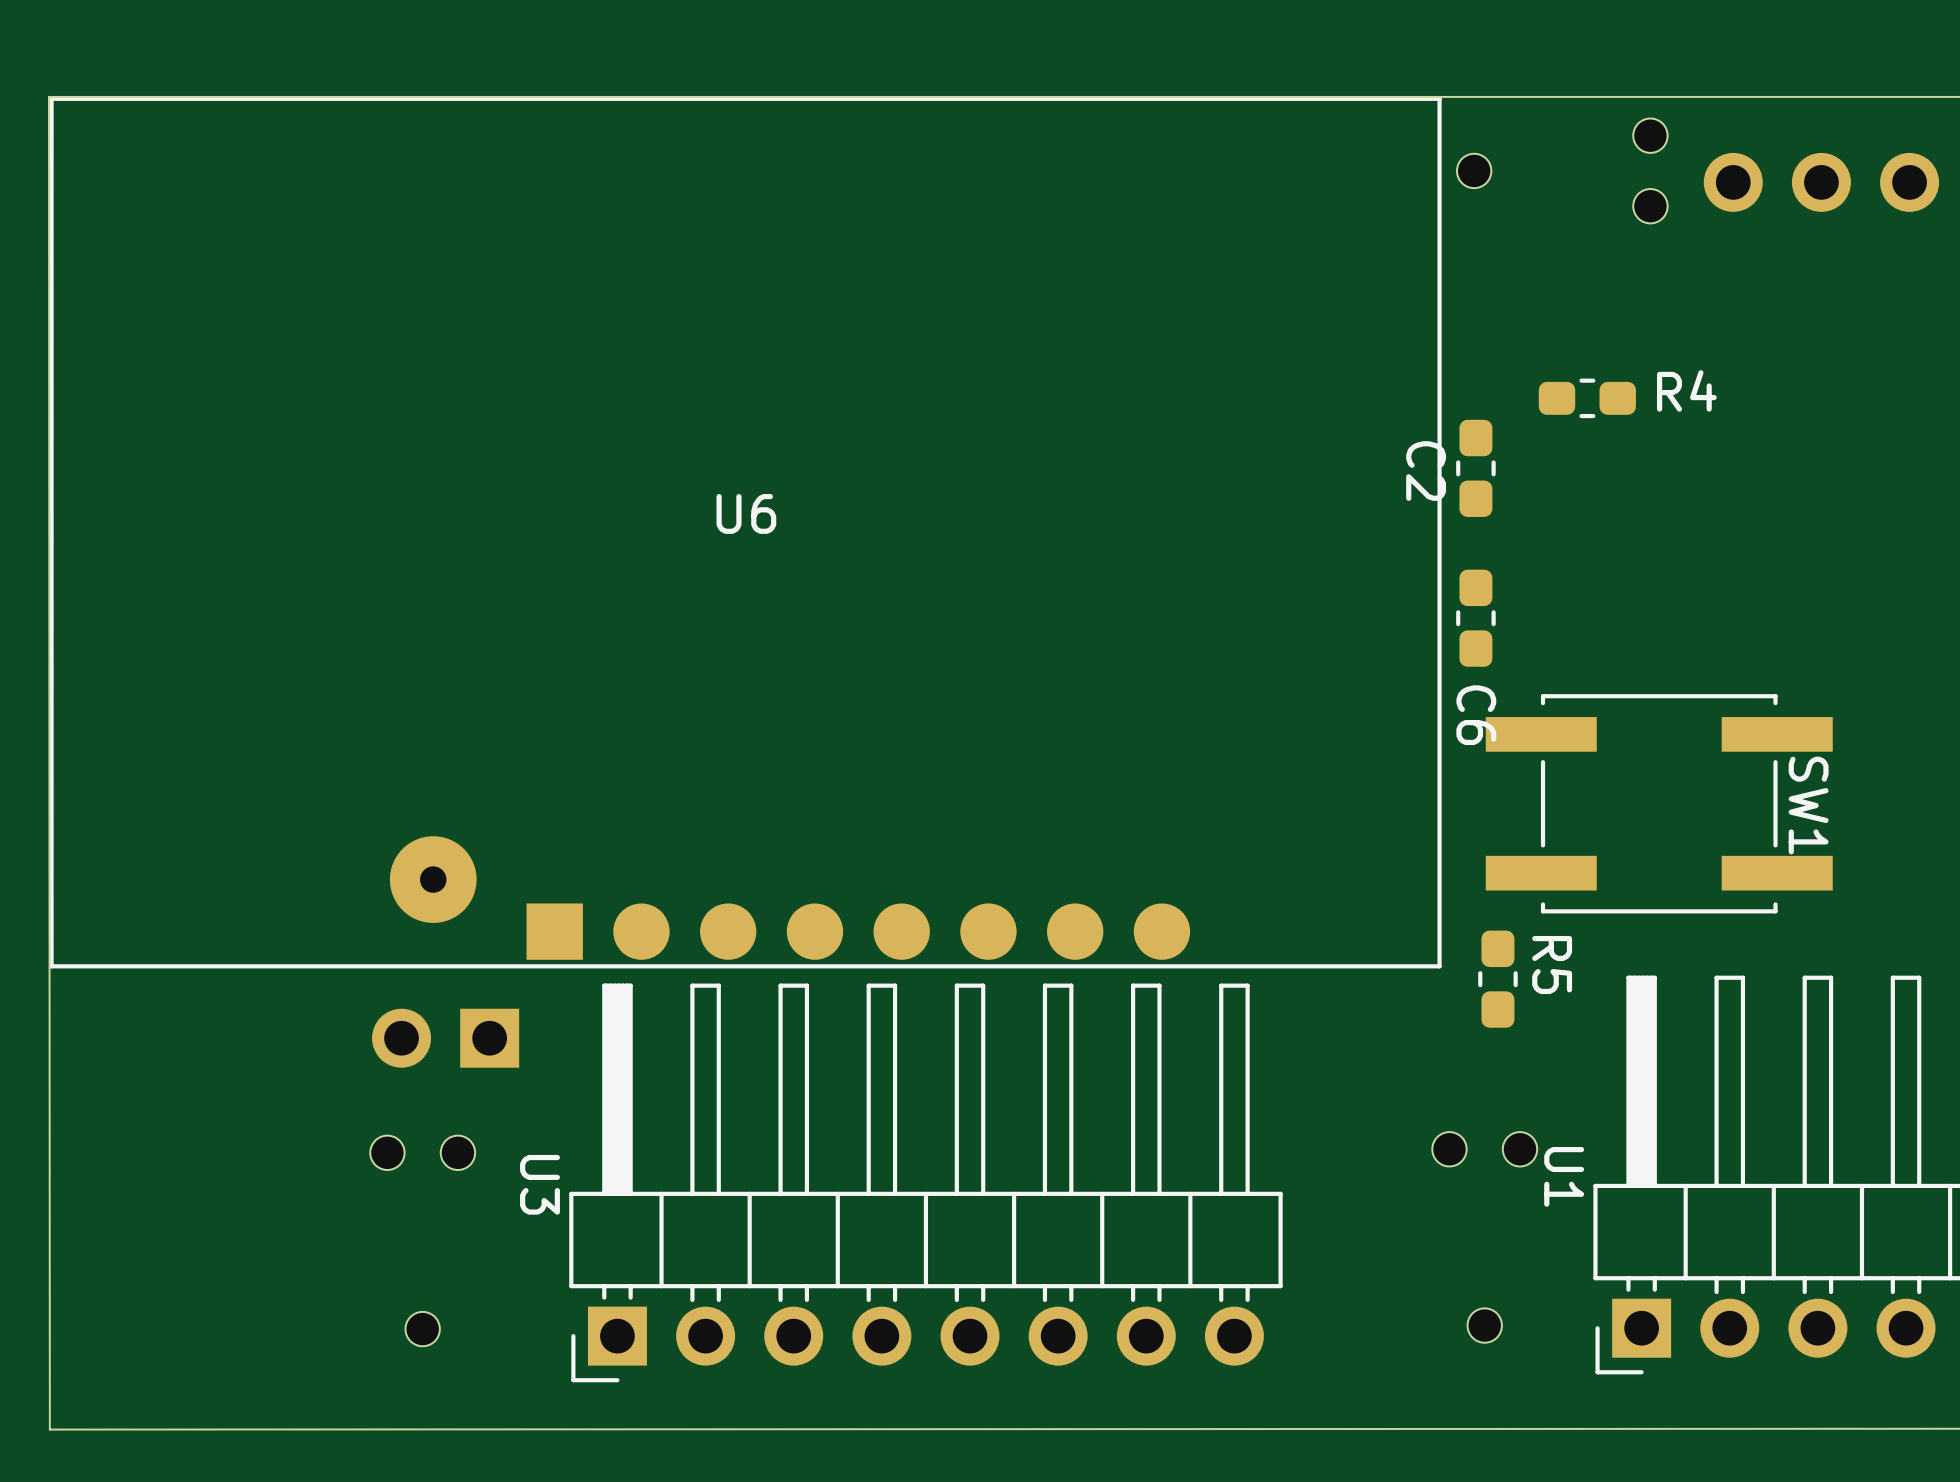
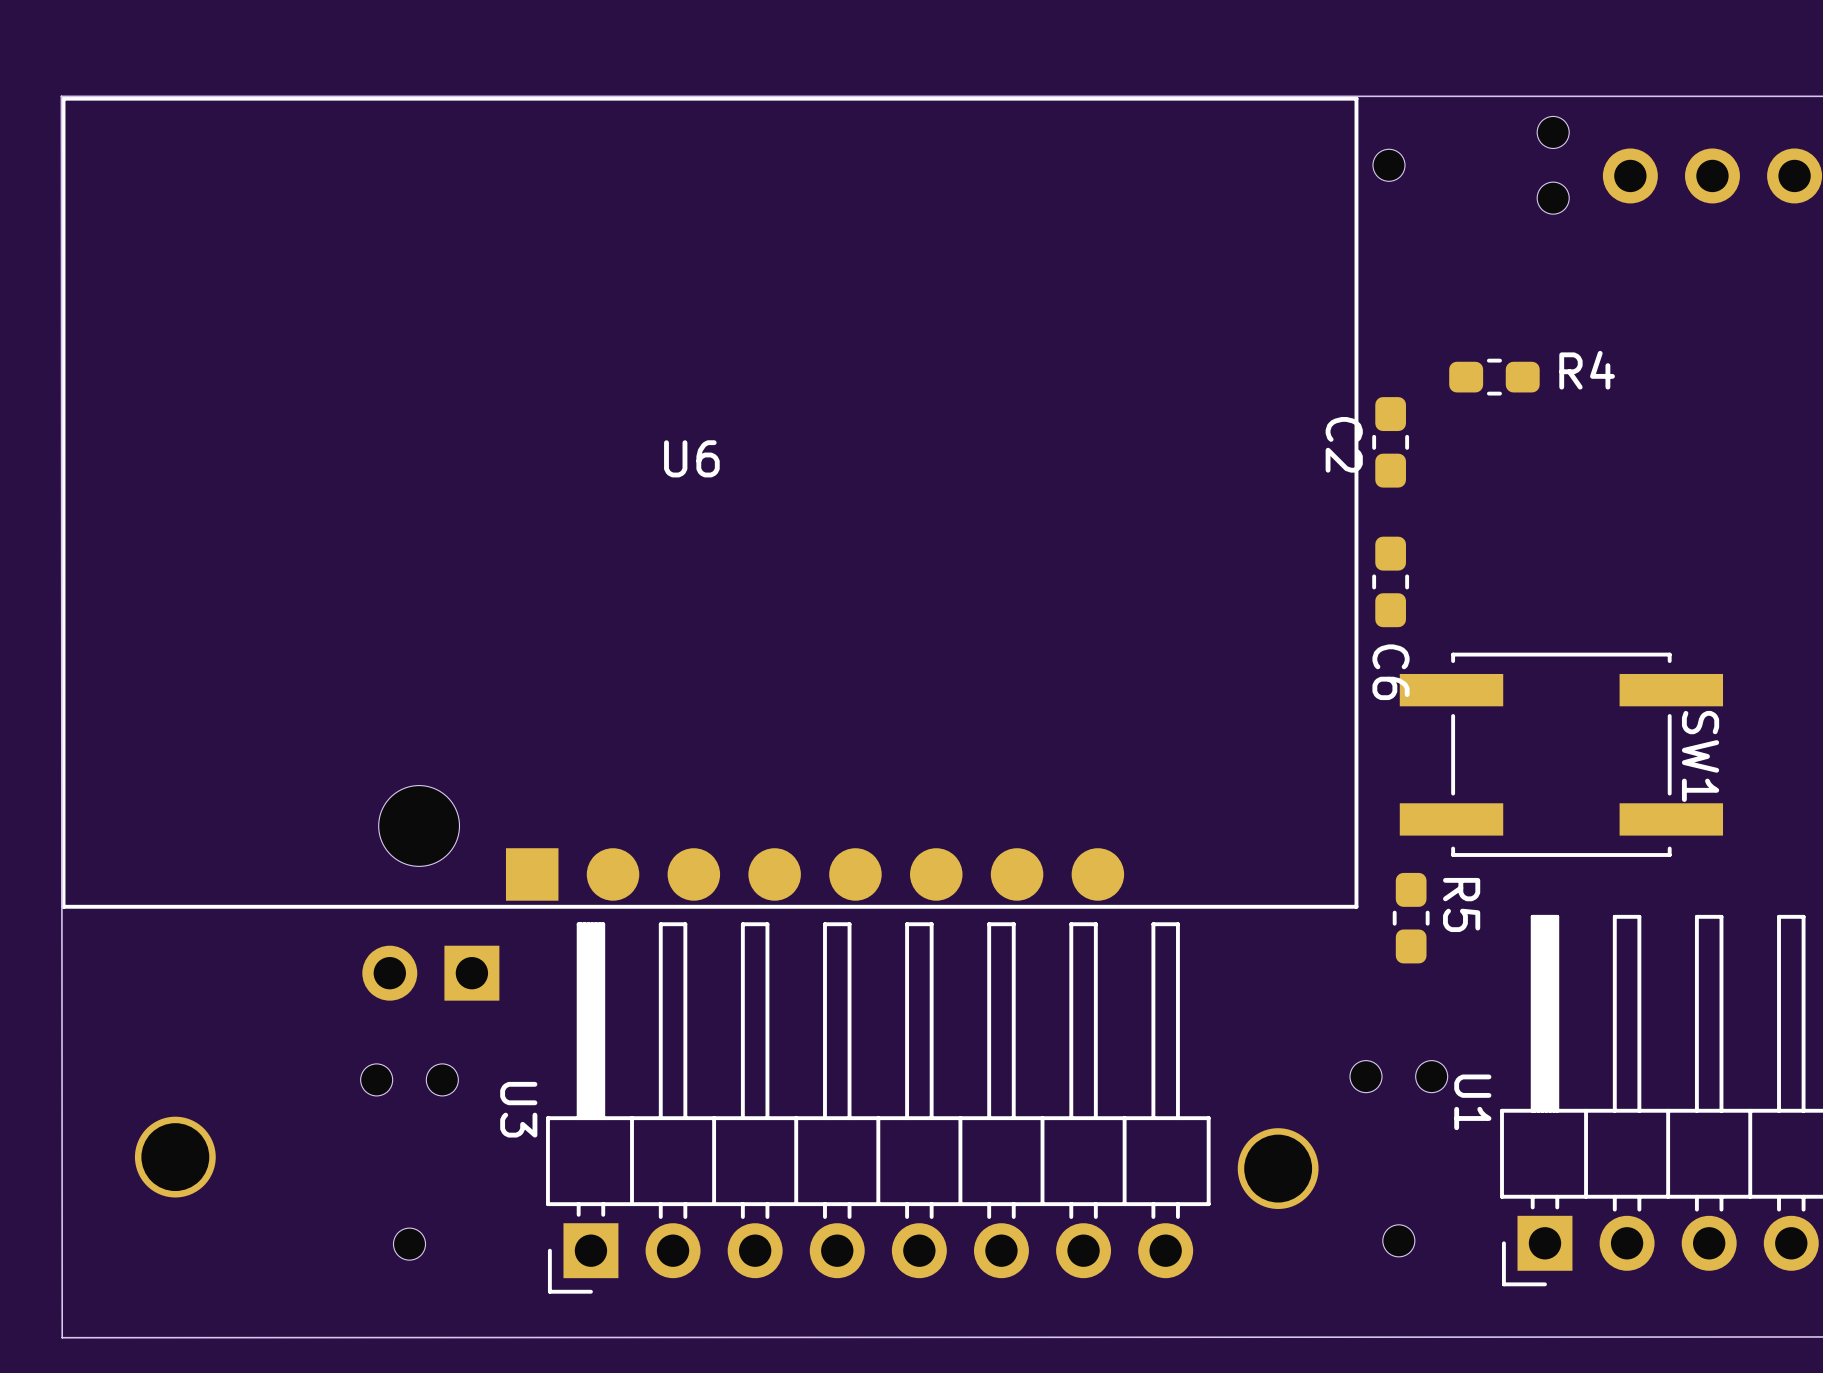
U6 footprint: [49, 96, 1442, 969] -> [61, 96, 1359, 909]
part: none -> (175, 1157)
part: none -> (1278, 1168)

